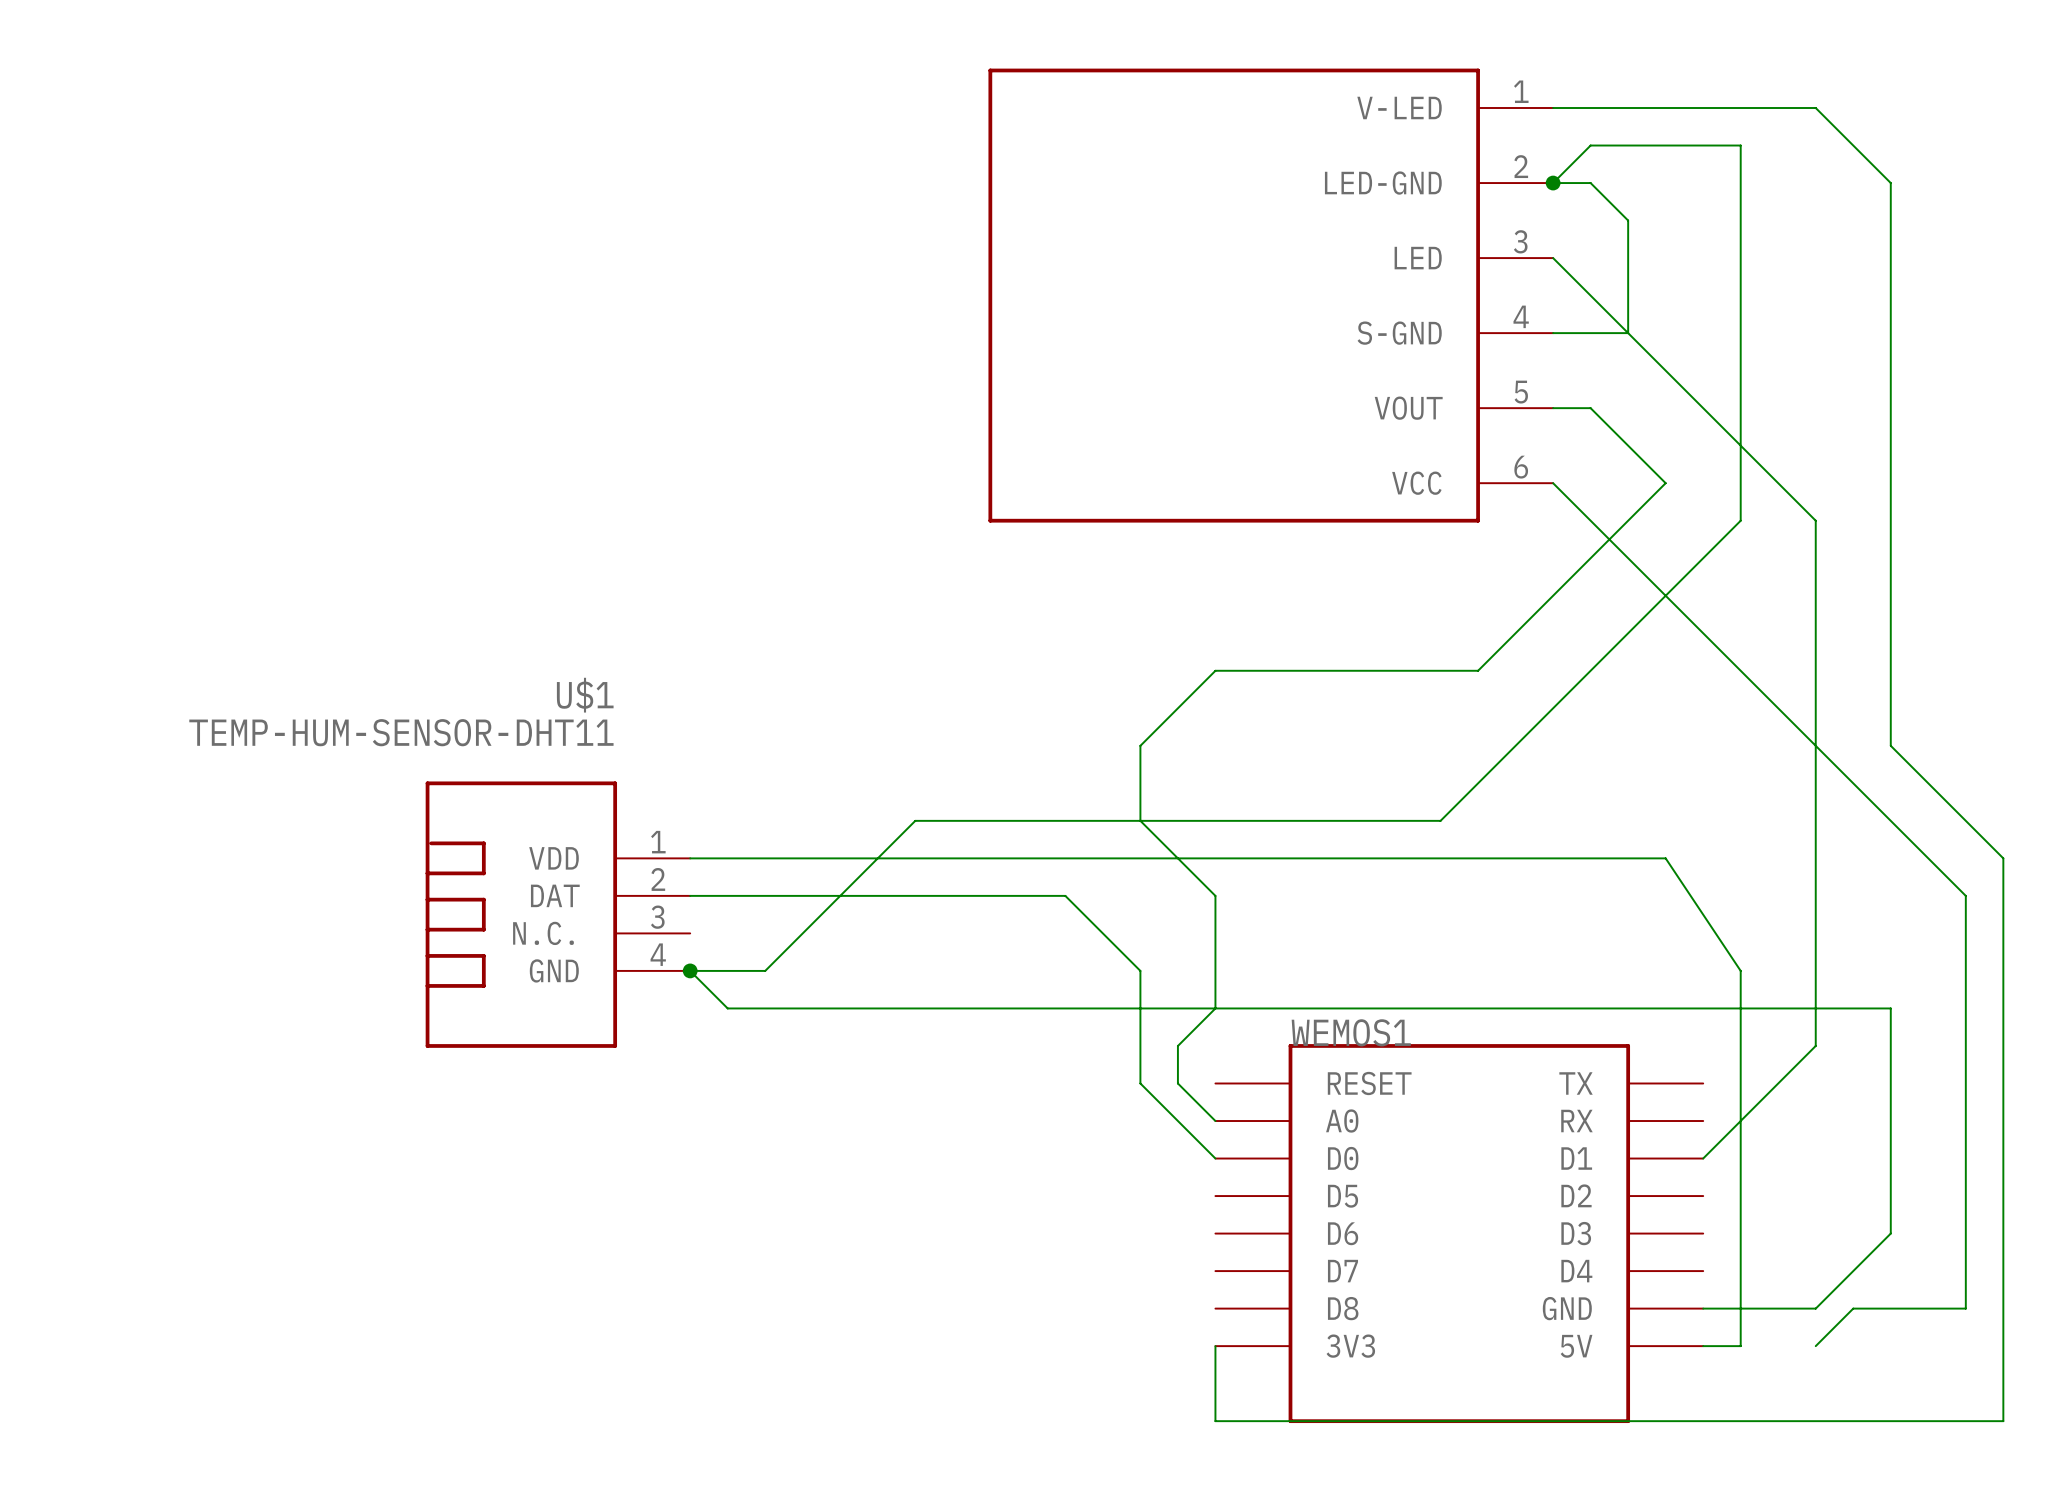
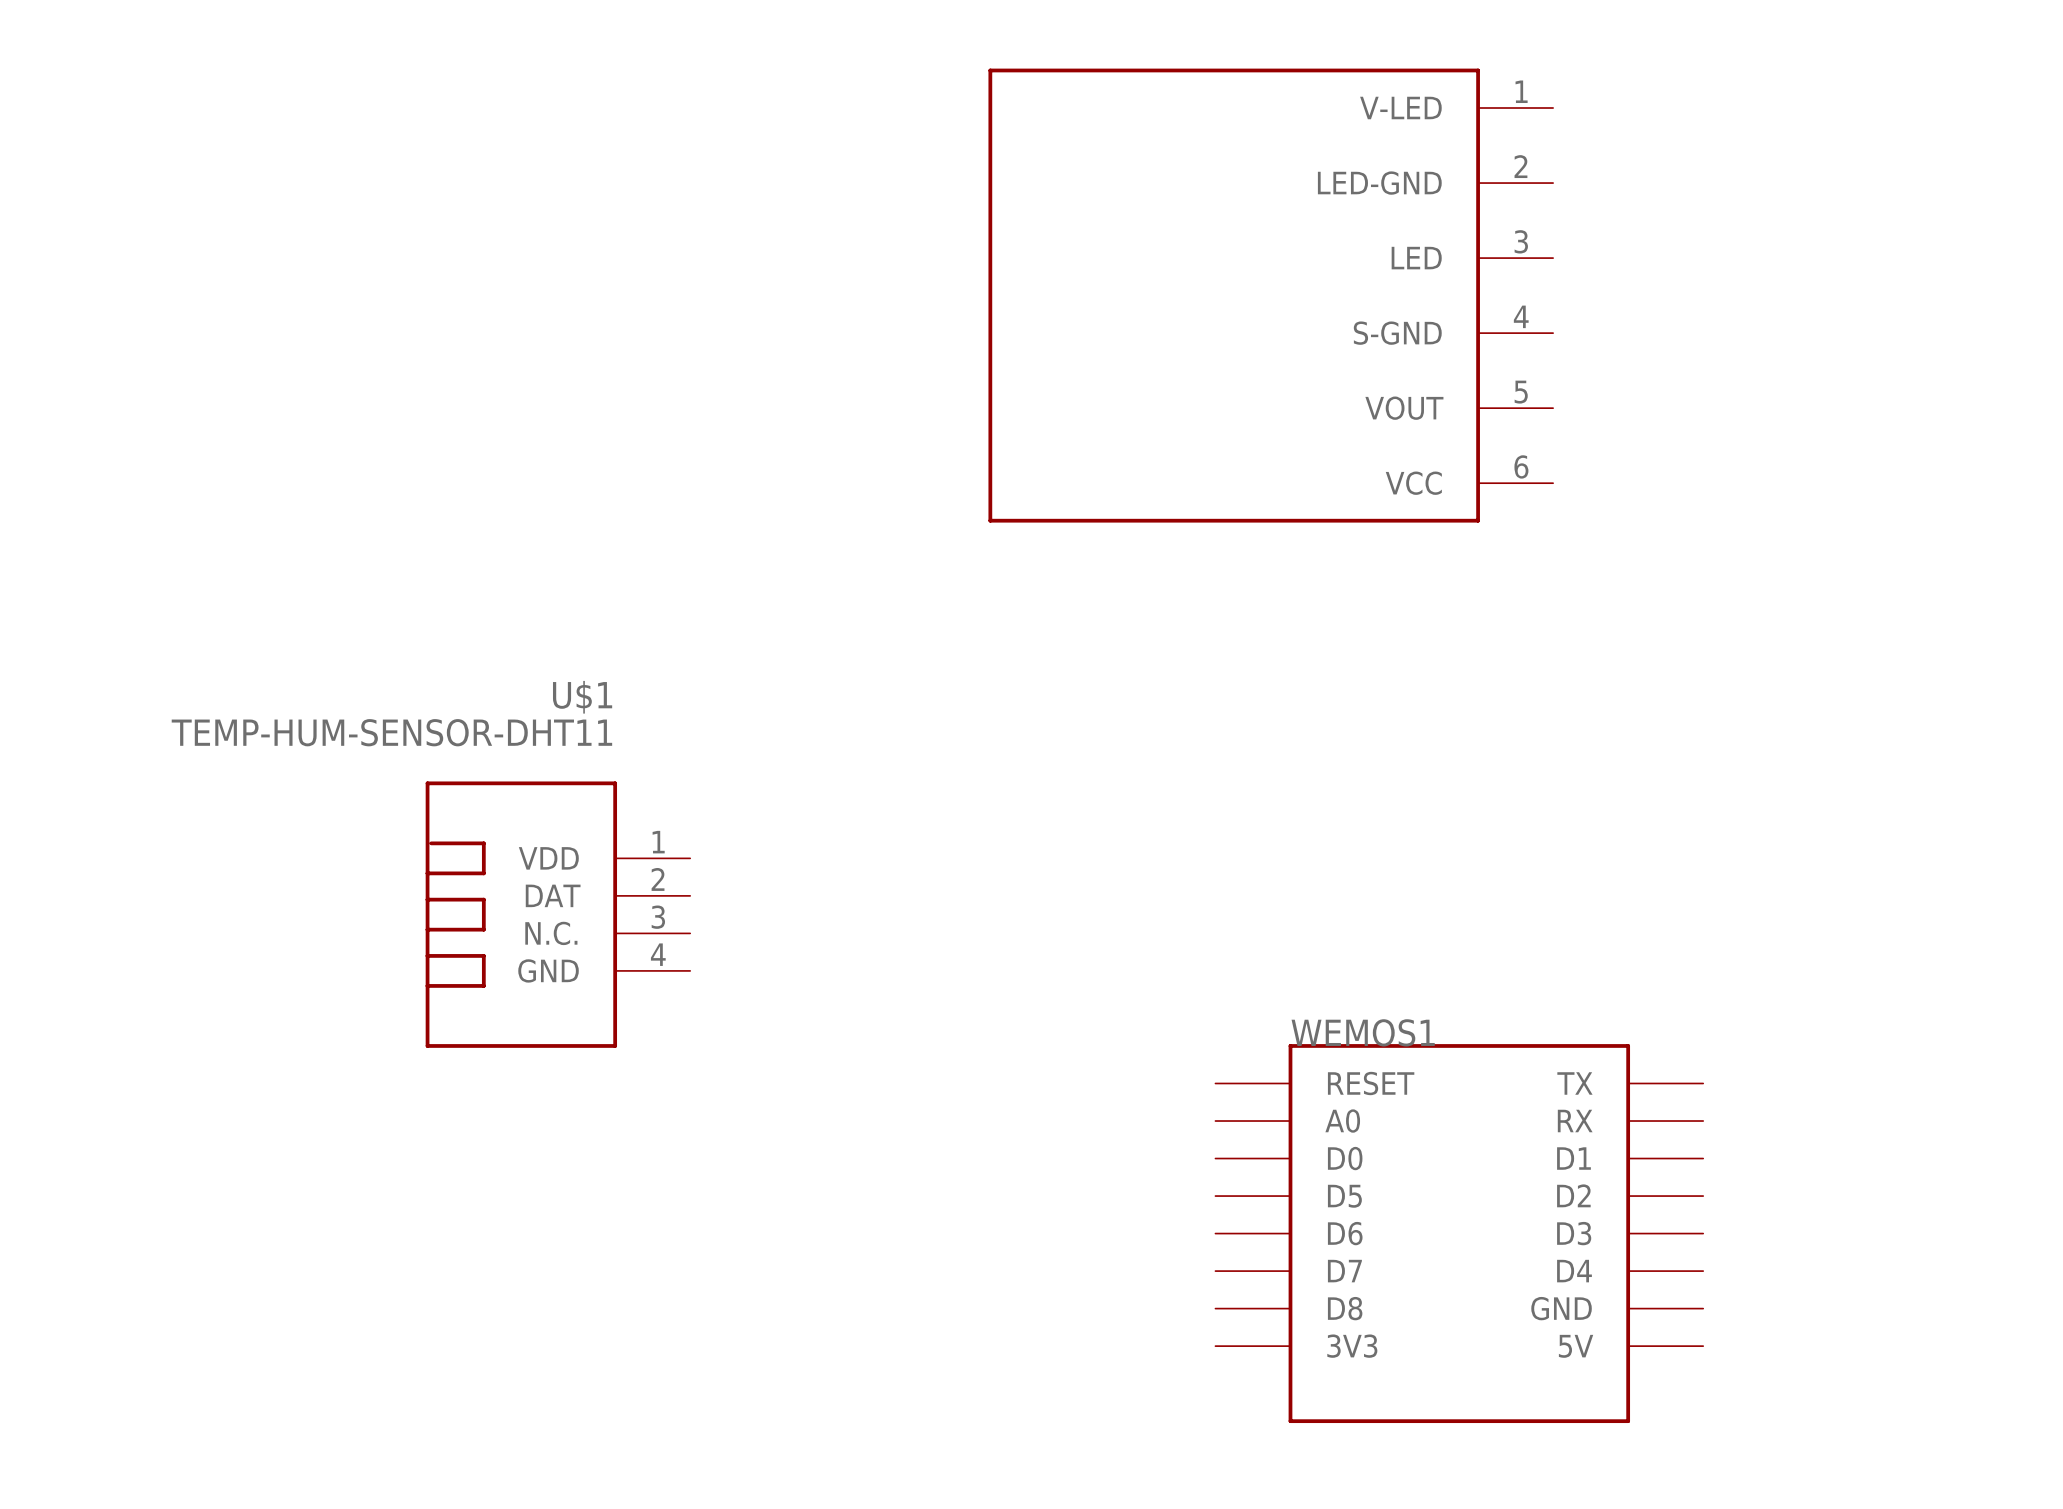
wire: (1553, 108) (1815, 108) (1890, 183) (1890, 745) (2003, 858) (2003, 1421) (1215, 1421) (1215, 1346) -> none
junction: (1553, 183) -> none
wire: (1553, 258) (1815, 520) (1815, 1045) (1703, 1158) -> none
wire: (1553, 333) (1628, 333) (1628, 220) (1590, 183) (1553, 183) (1590, 145) (1740, 145) (1740, 520) (1440, 820) (915, 820) (765, 970) (690, 970) (727, 1008) (1890, 1008) (1890, 1233) (1815, 1308) (1703, 1308) -> none
wire: (1553, 408) (1590, 408) (1665, 483) (1478, 670) (1215, 670) (1140, 745) (1140, 820) (1215, 895) (1215, 1008) (1177, 1045) (1177, 1083) (1215, 1121) -> none
wire: (1553, 483) (1965, 895) (1965, 1308) (1853, 1308) (1815, 1346) -> none
wire: (690, 858) (1665, 858) (1740, 970) (1740, 1346) (1703, 1346) -> none
wire: (690, 895) (1065, 895) (1140, 970) (1140, 1083) (1215, 1158) -> none
junction: (690, 970) -> none

